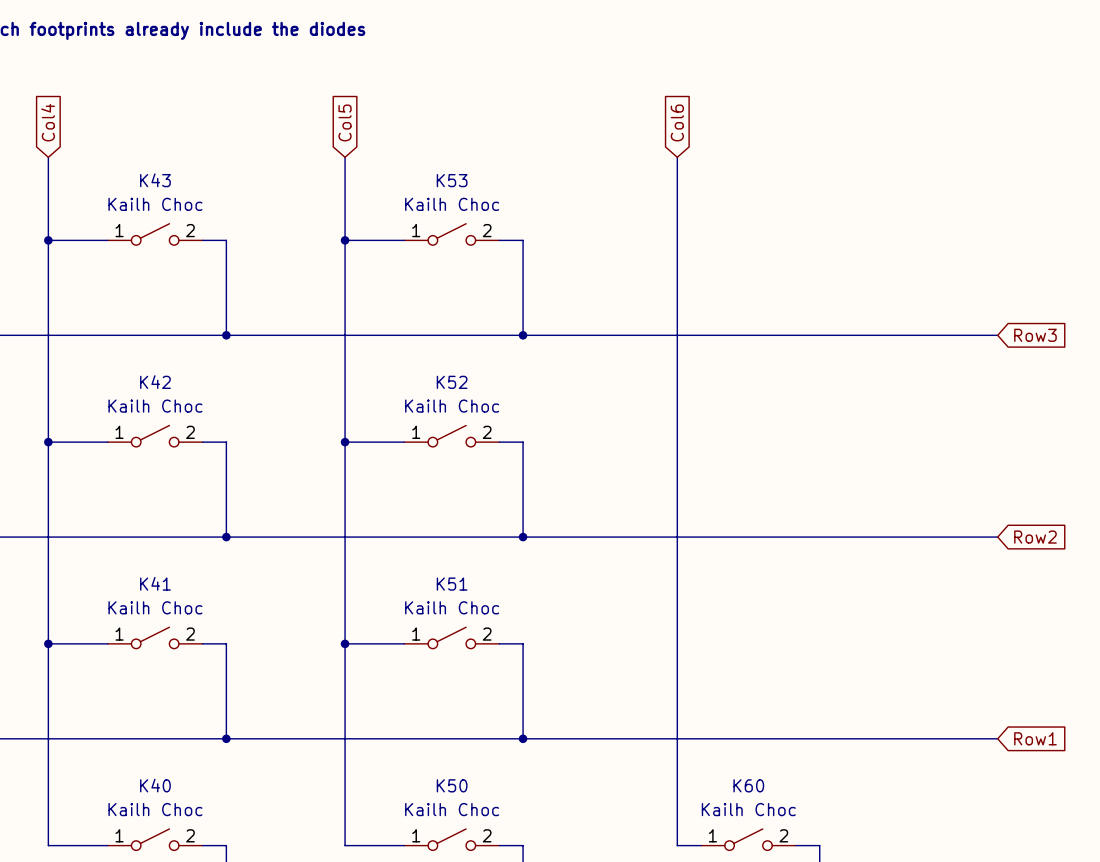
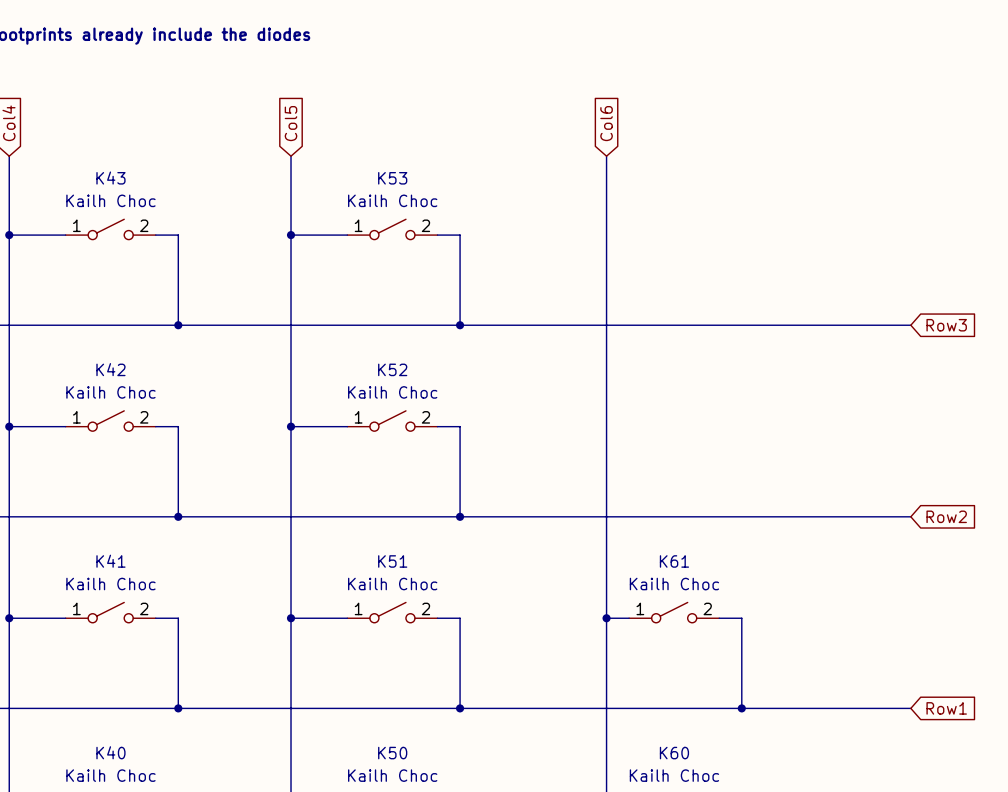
K61: none -> Kailh Choc (674, 612)
wire: none -> (606, 618) (629, 618)
junction: none -> (606, 618)
wire: none -> (719, 618) (741, 618) (741, 708)
junction: none -> (741, 708)

